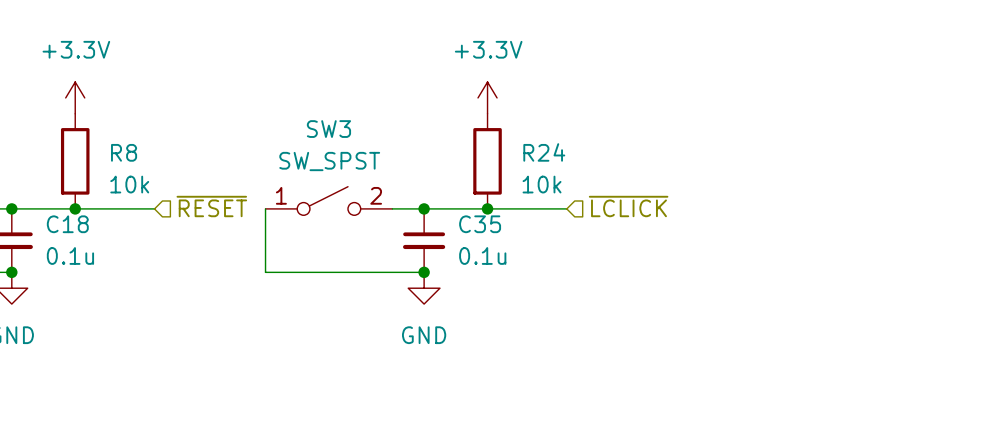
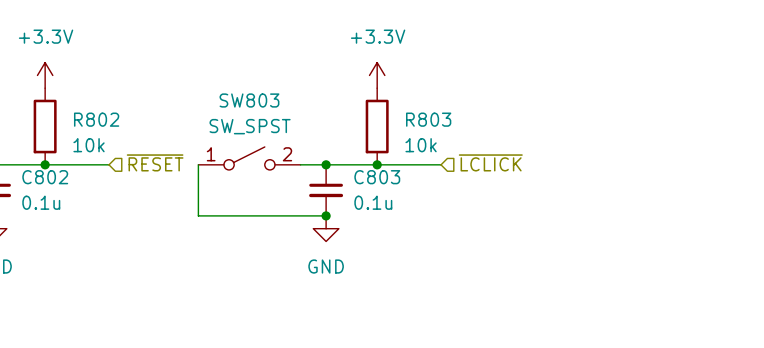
SW3 name: SW3 (328, 129) -> SW803 (249, 100)
R8 name: R8 (124, 152) -> R802 (96, 119)
R24 name: R24 (544, 152) -> R803 (428, 119)
C18 name: C18 (67, 224) -> C802 (45, 177)
C35 name: C35 (480, 224) -> C803 (377, 177)

